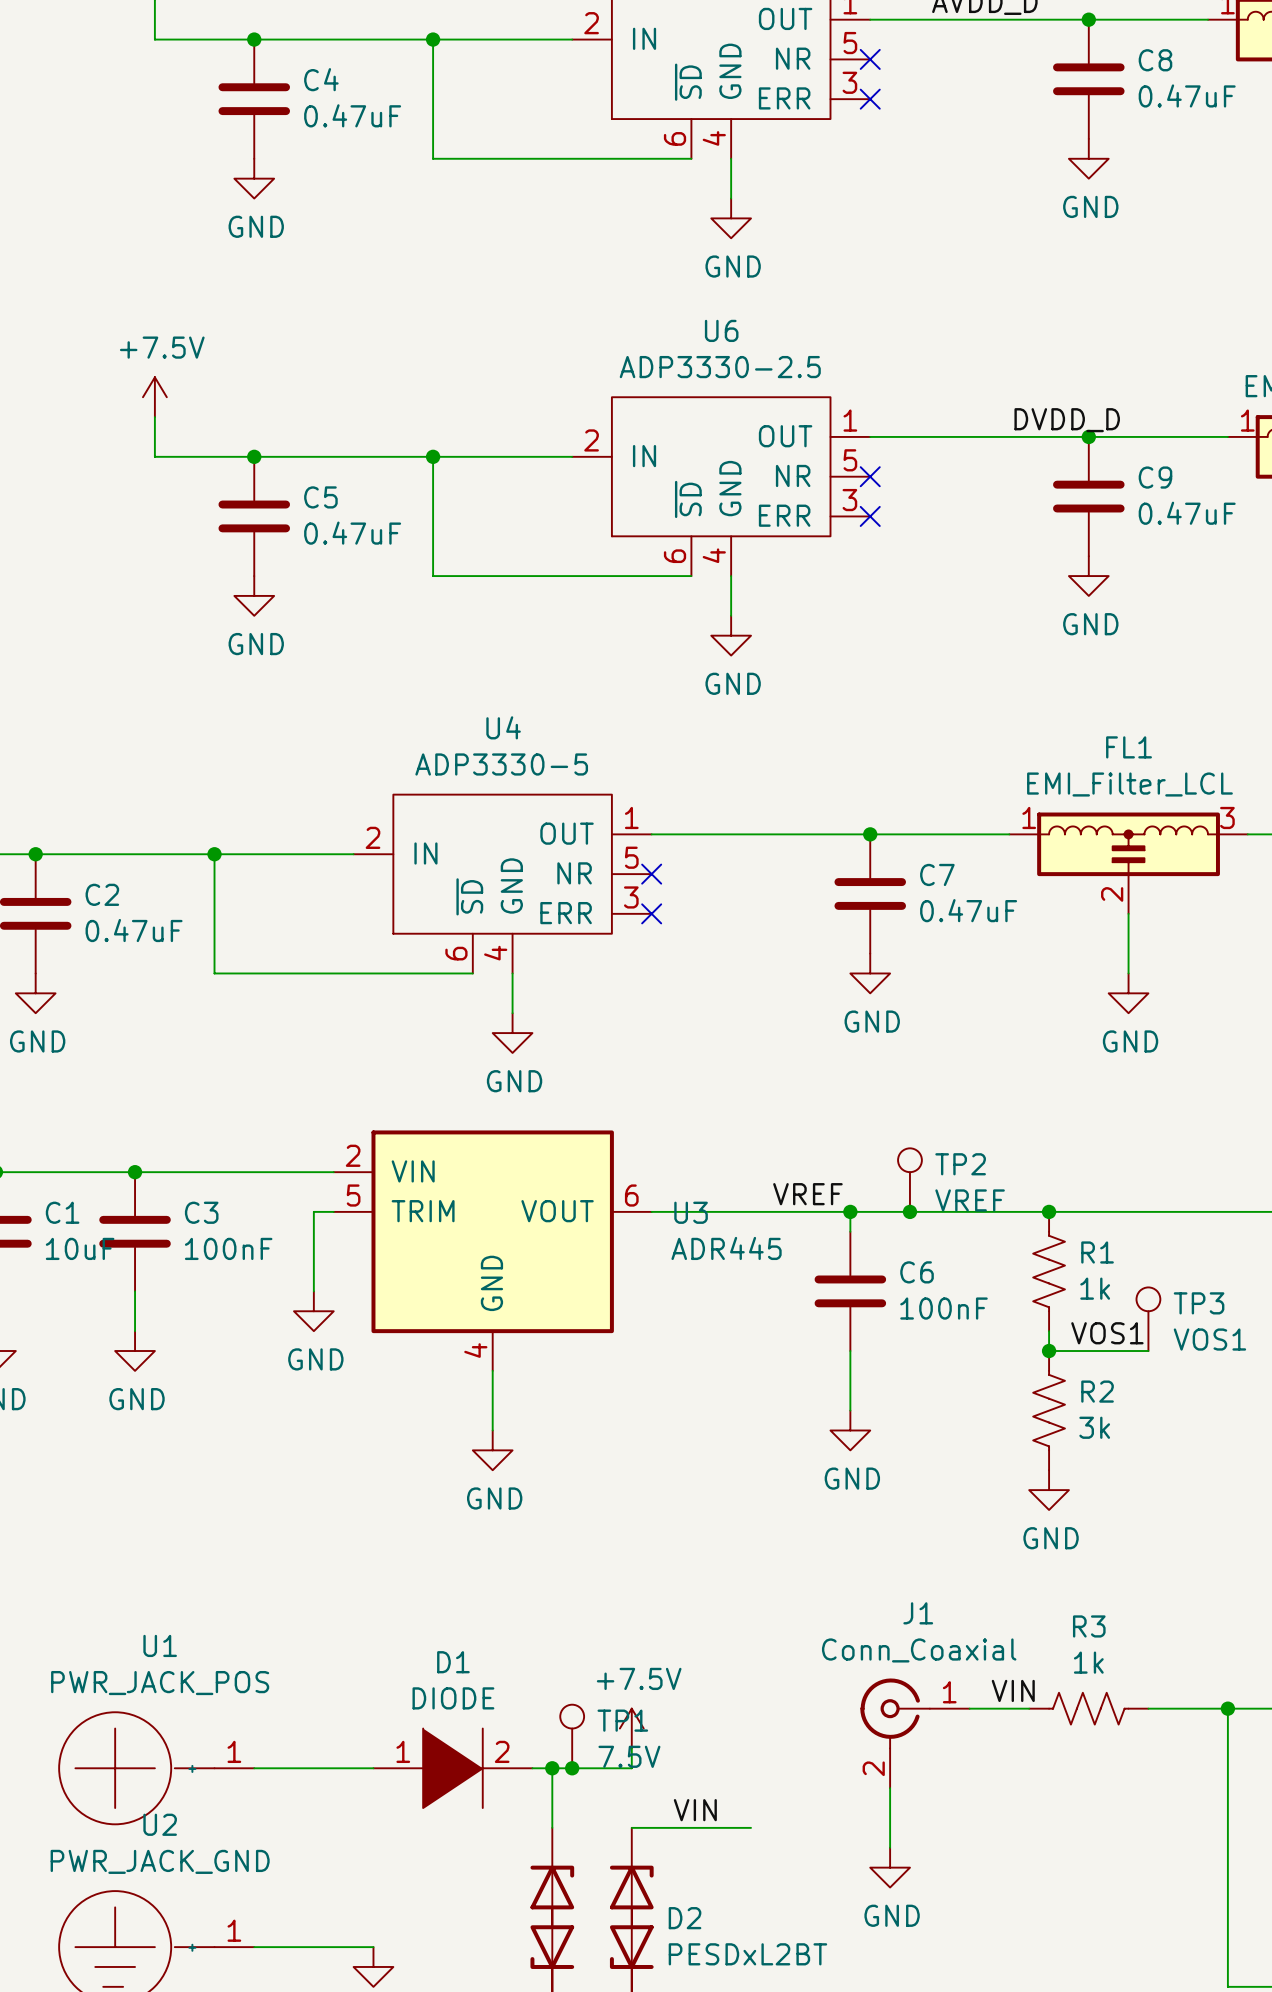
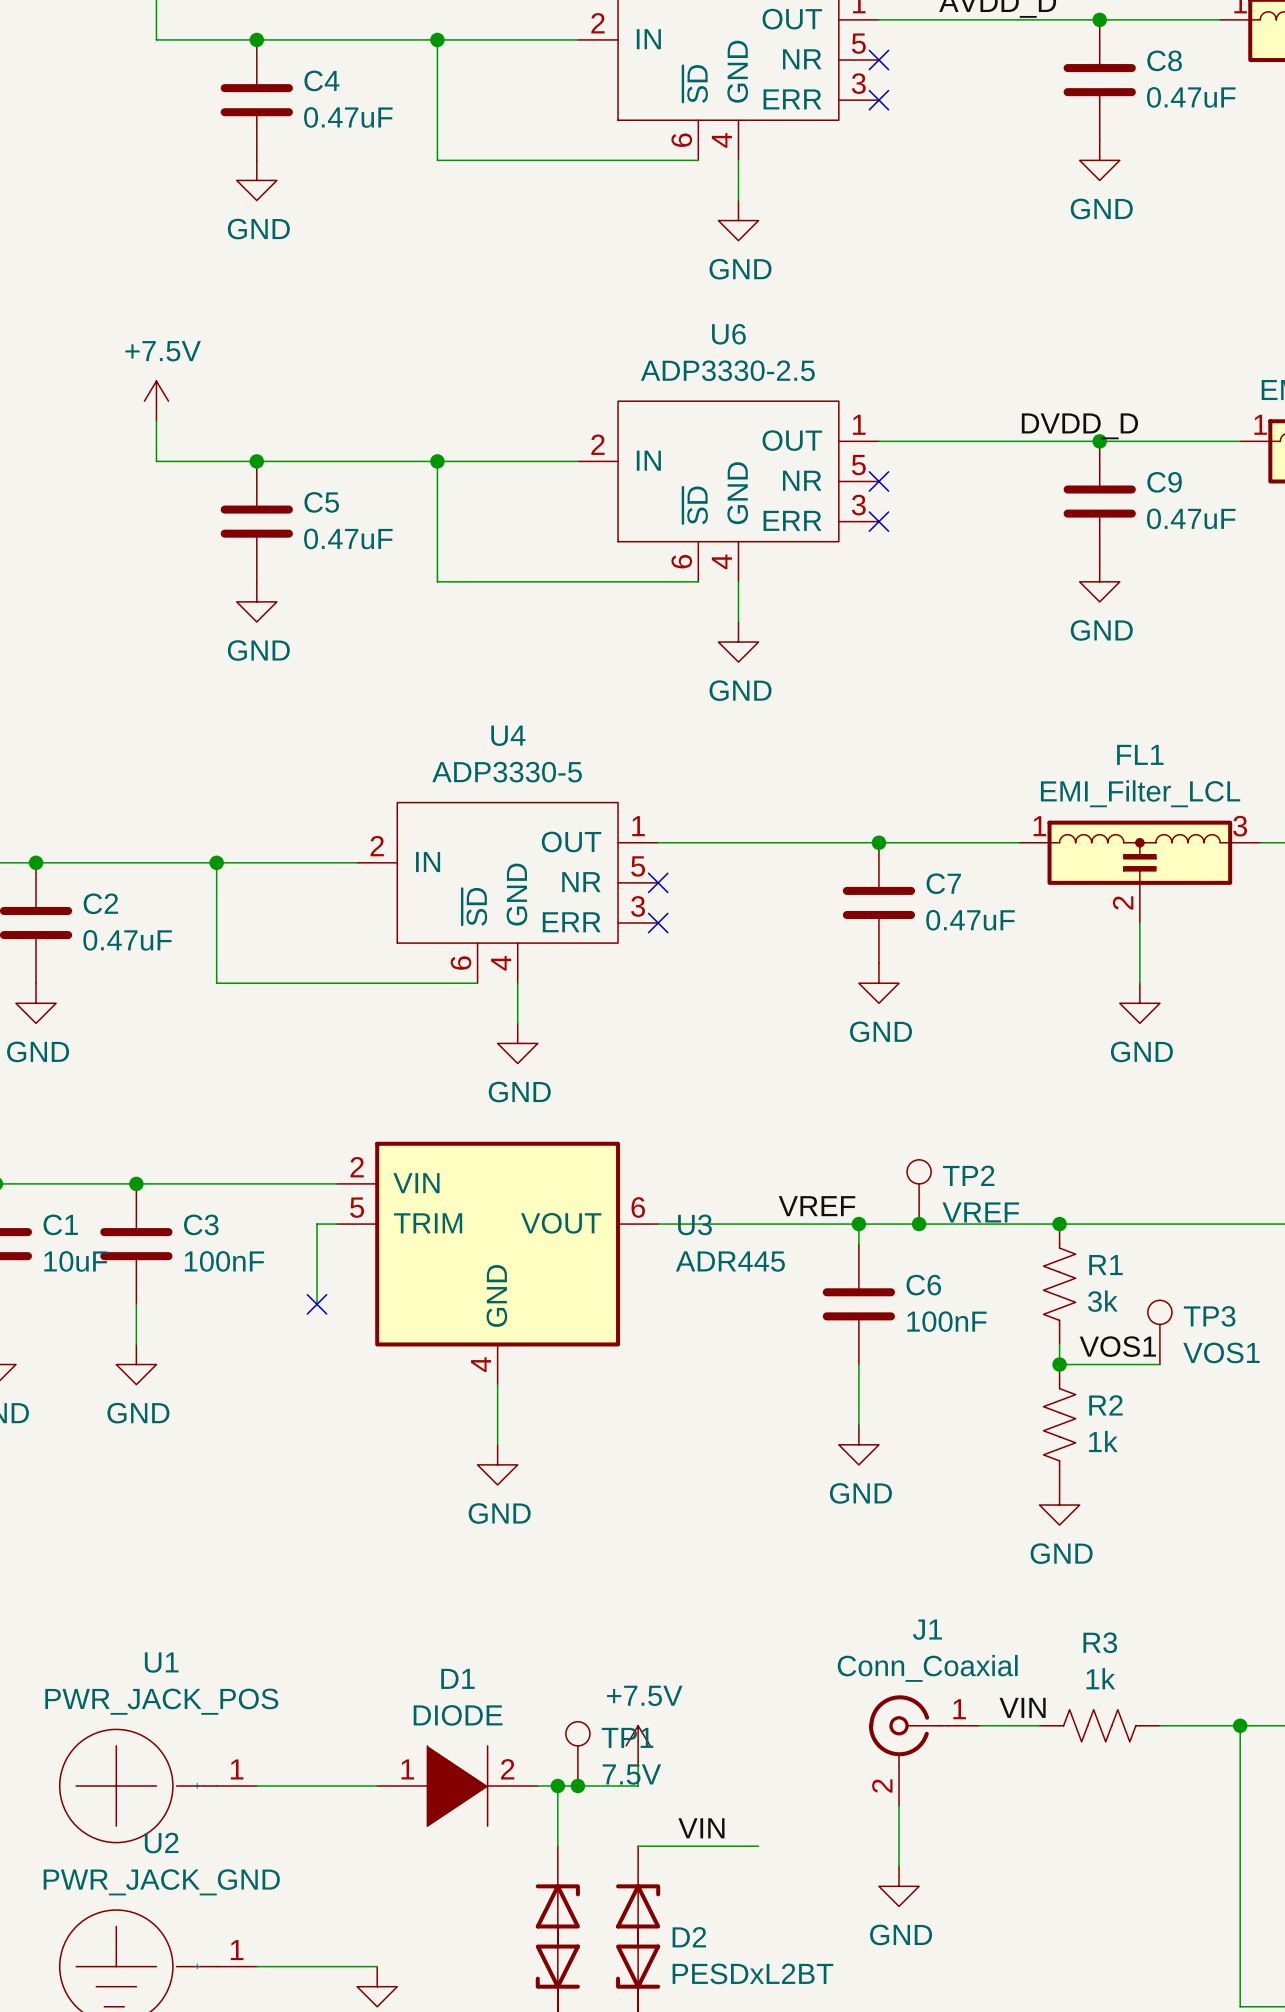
R1 value: 1k (1095, 1288) -> 3k (1102, 1301)
no-connect mark: none -> (317, 1304)
power symbol: GND (313, 1311) -> none
R2 value: 3k (1094, 1427) -> 1k (1103, 1441)

